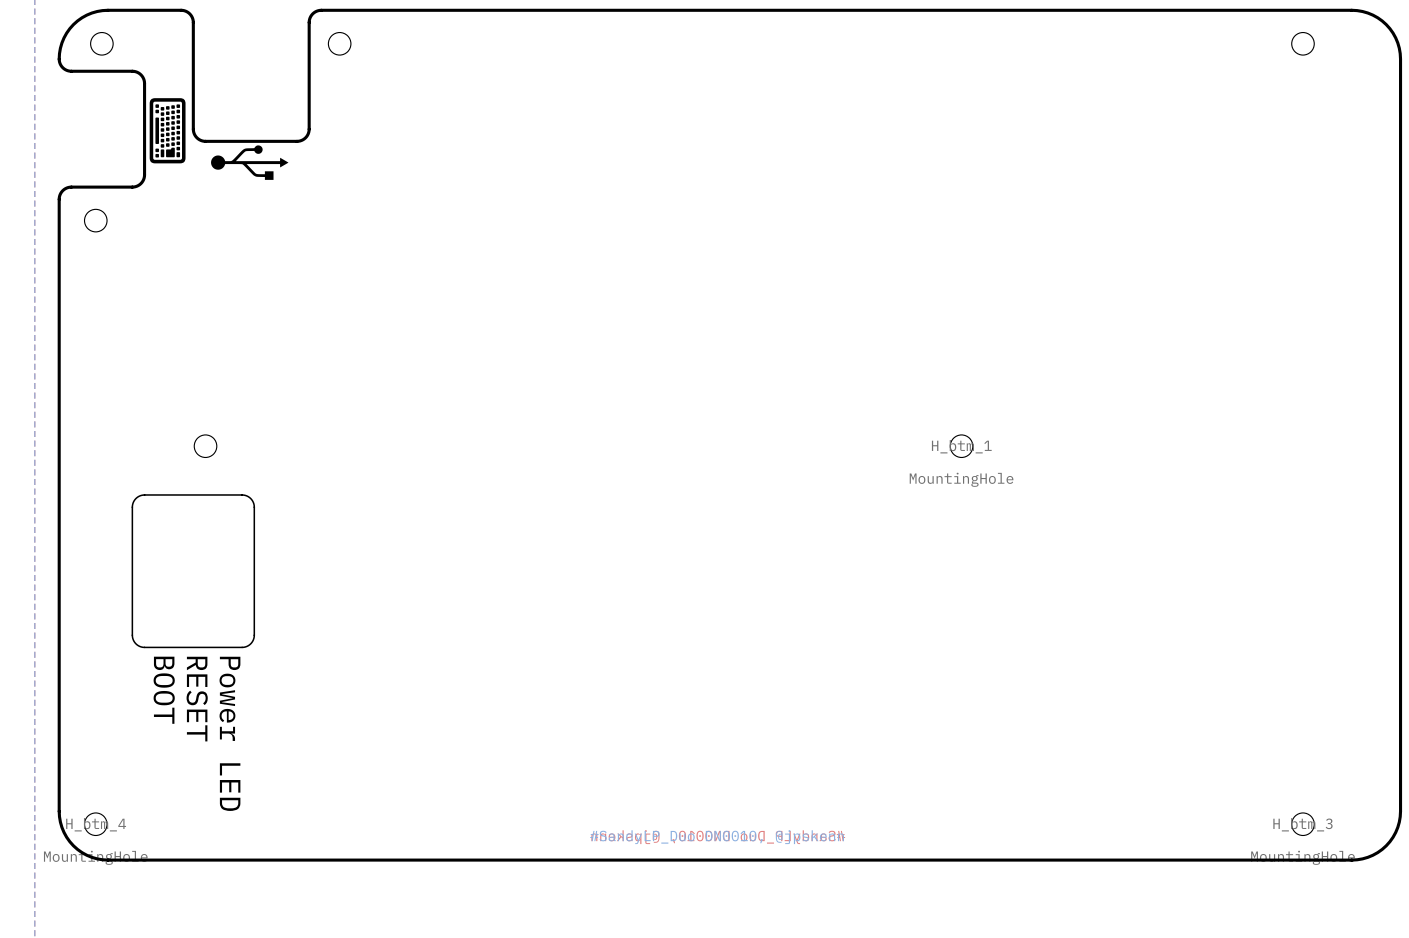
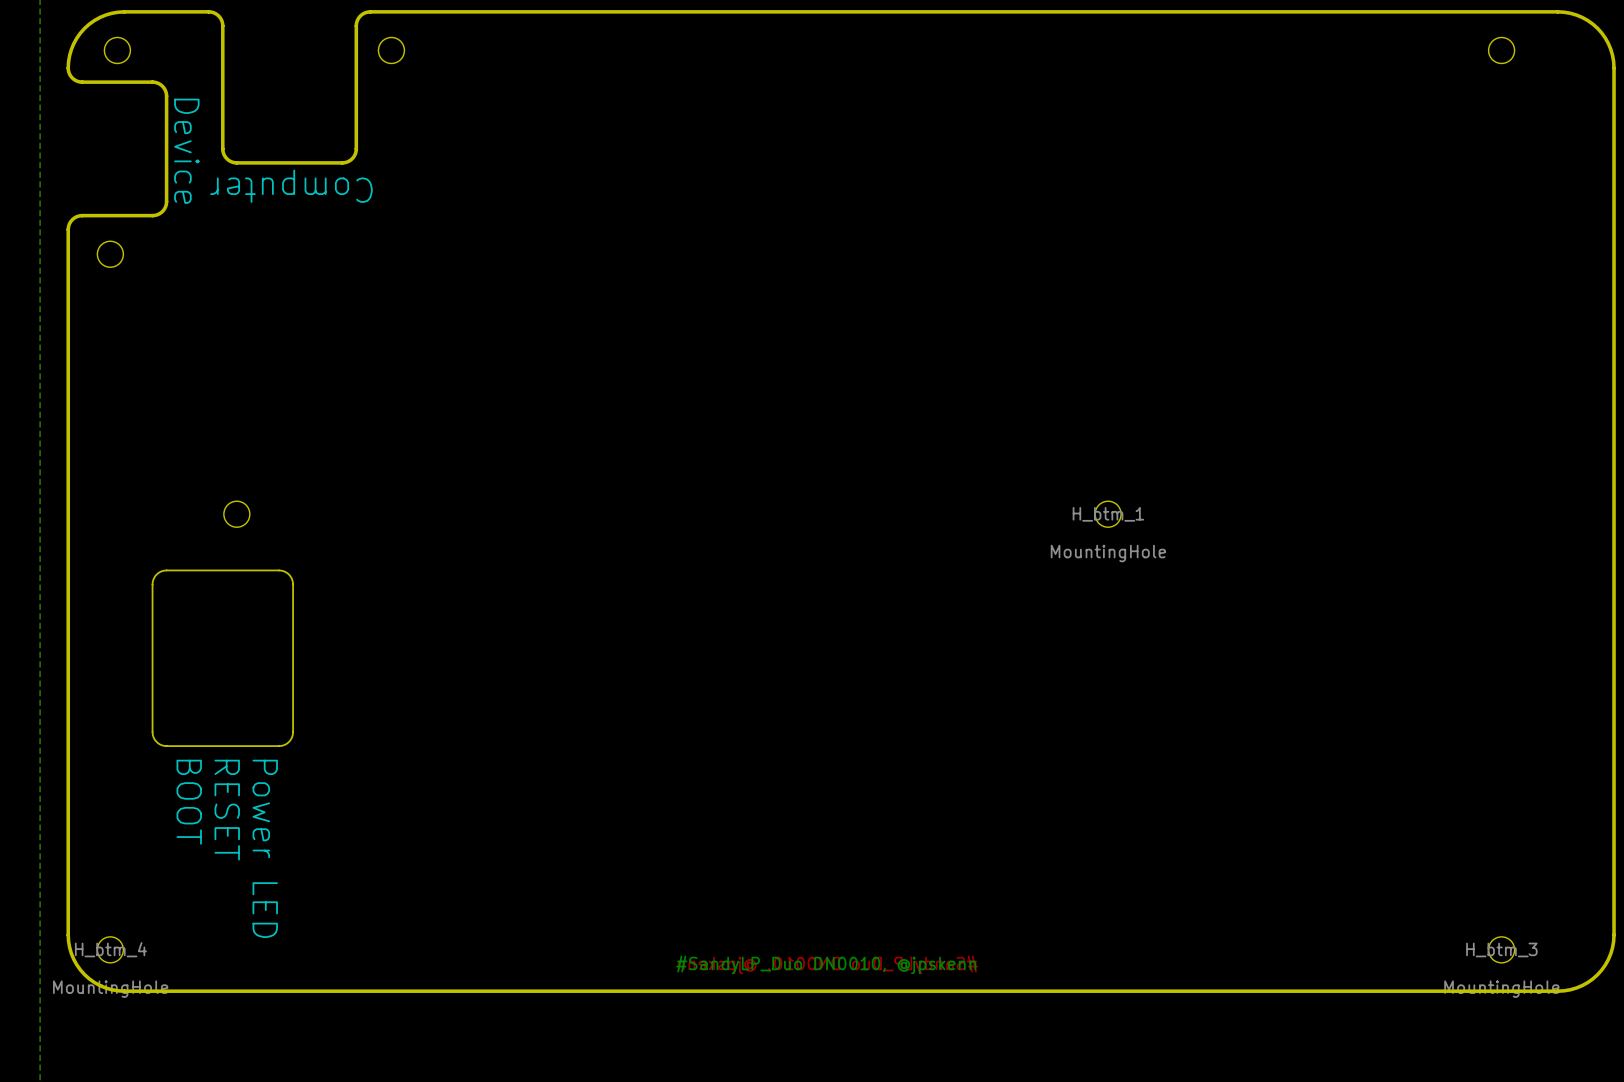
text: ⌨️ (167, 130) -> Device (186, 151)
drawing: [211, 145, 289, 180] -> none
text: none -> Computer (291, 186)

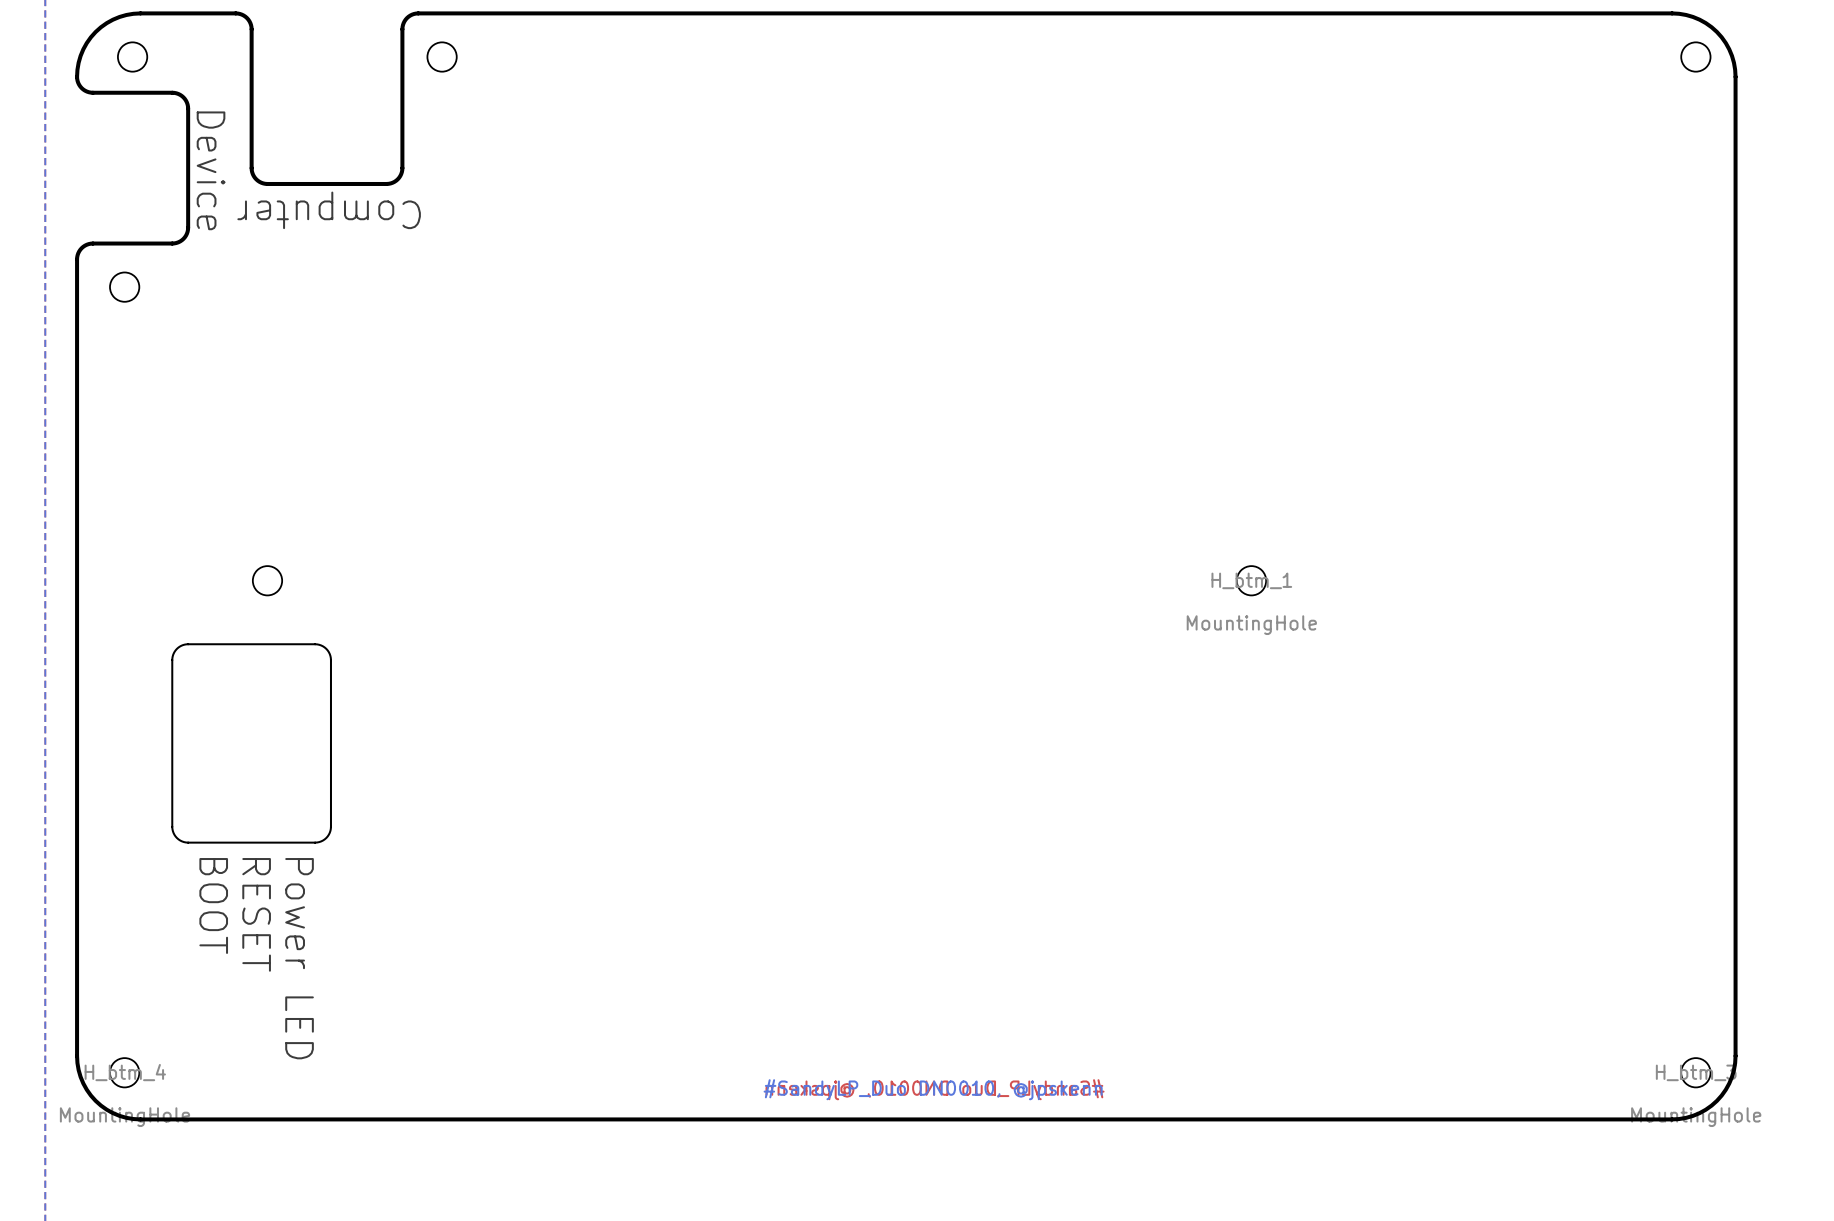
drawing: [66, 10, 1616, 993] -> none
drawing: none -> [75, 11, 1738, 1122]

